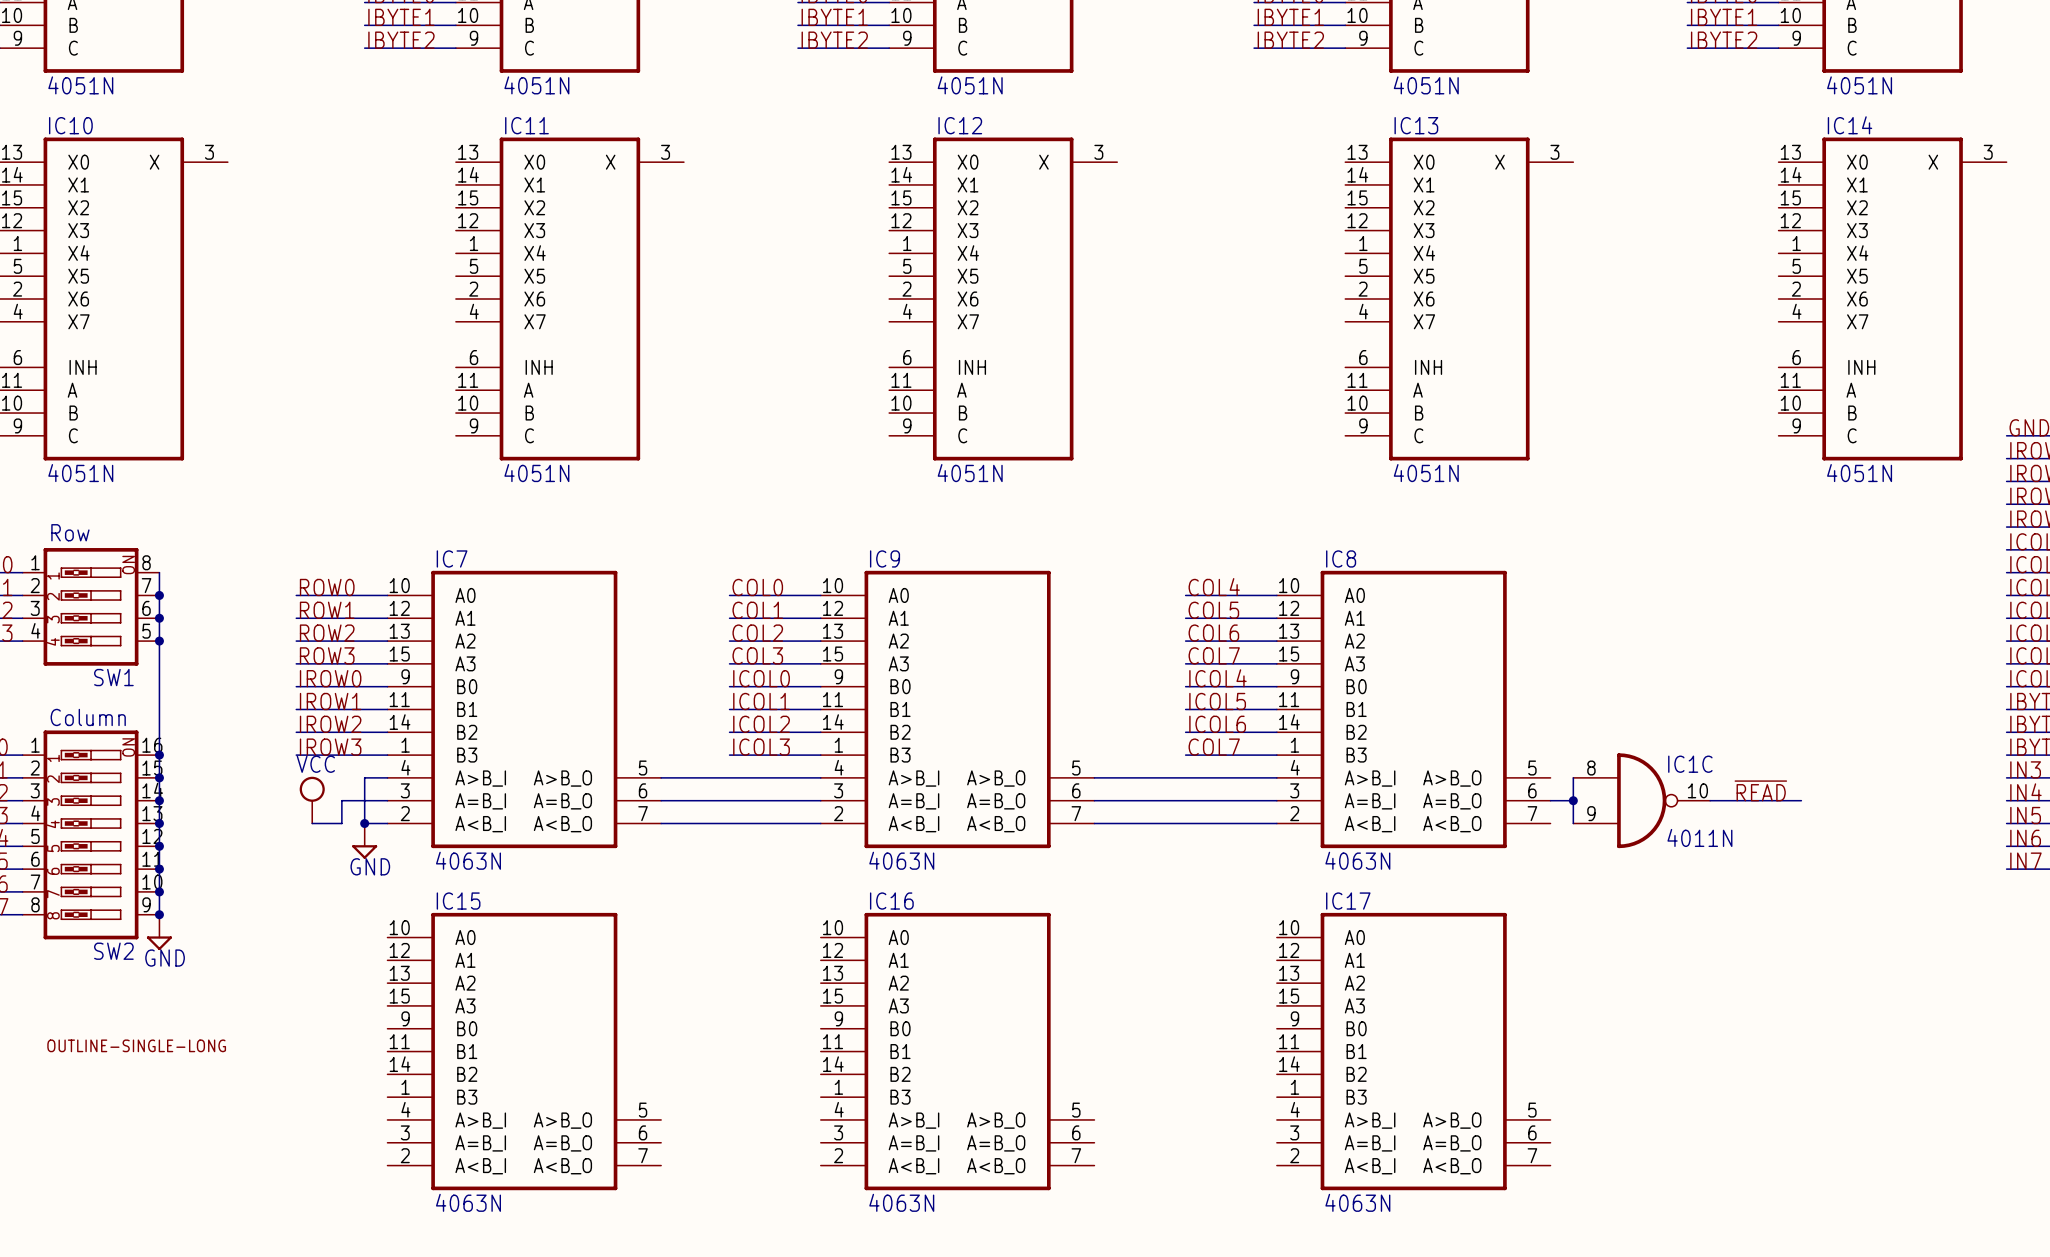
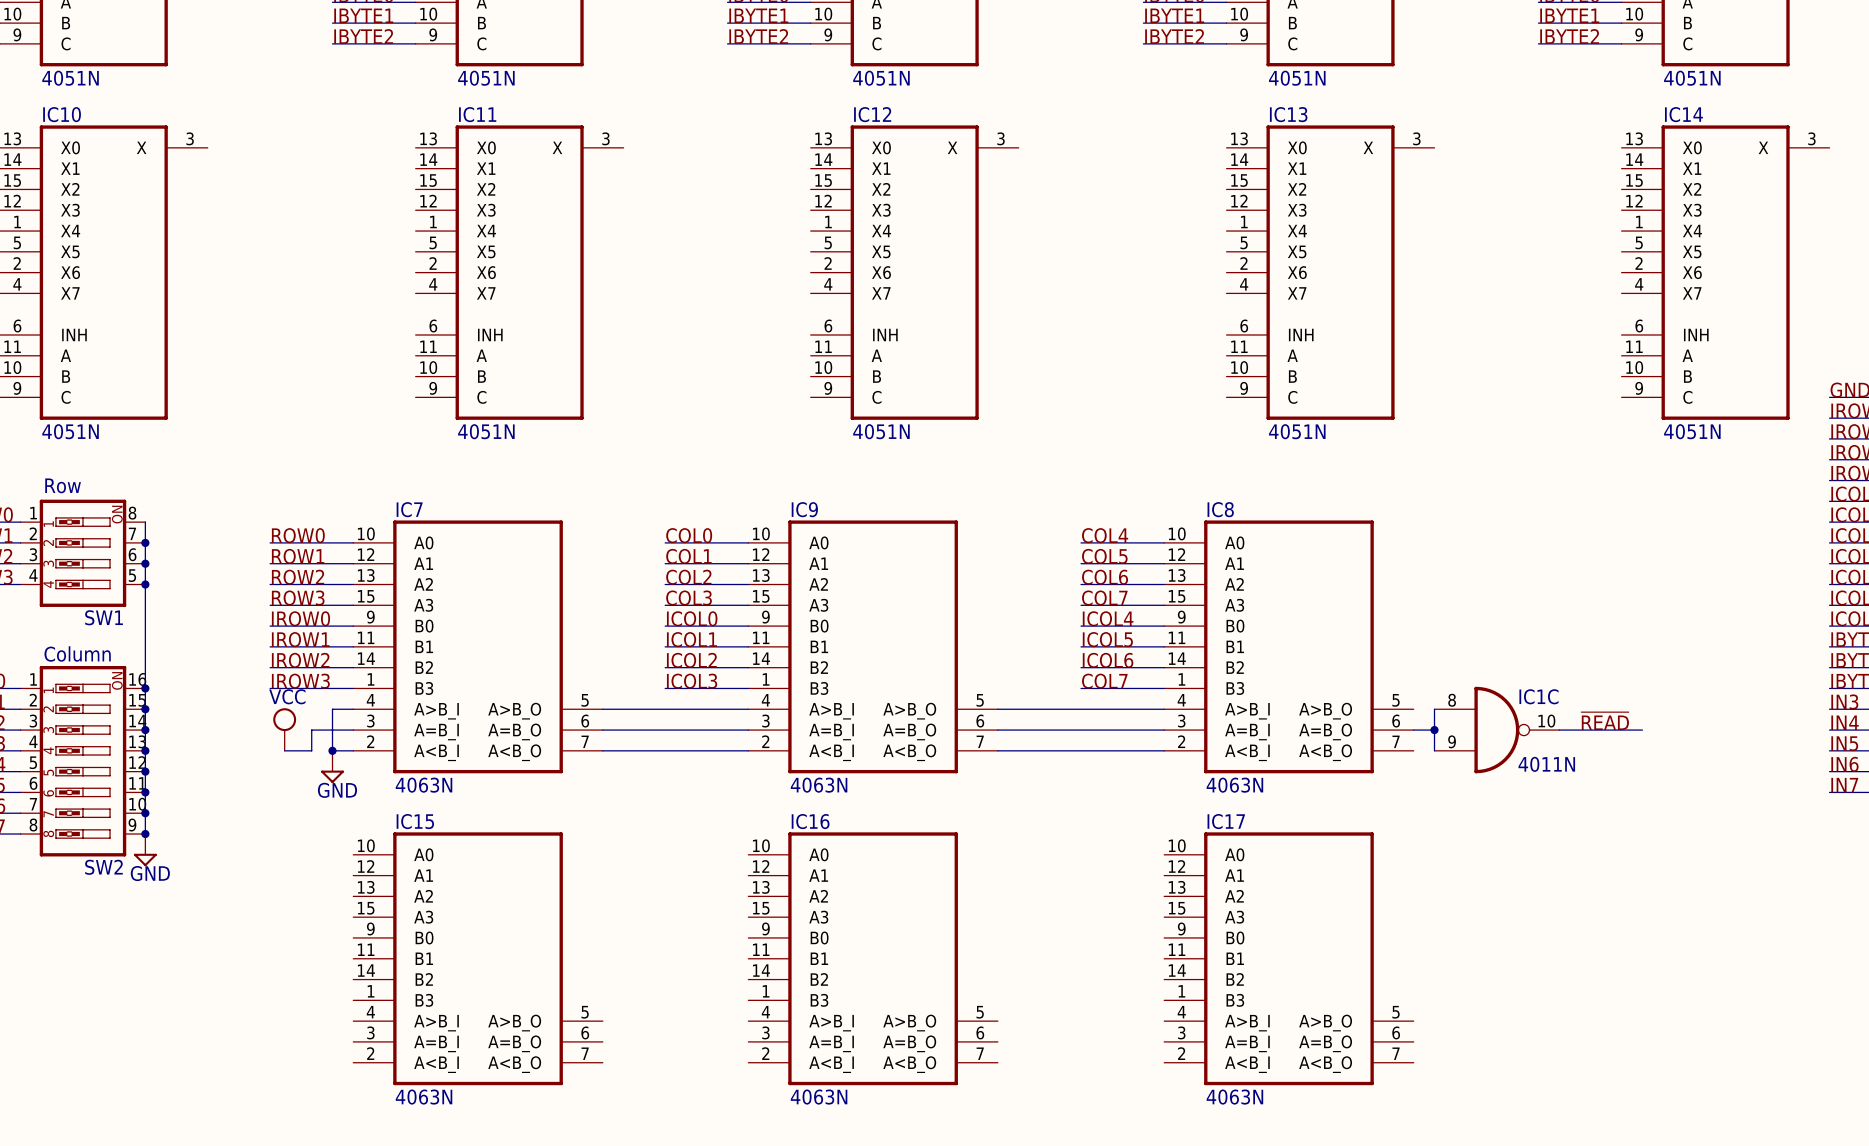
part: OUTLINE-SINGLE-LONG (136, 1045) -> none

